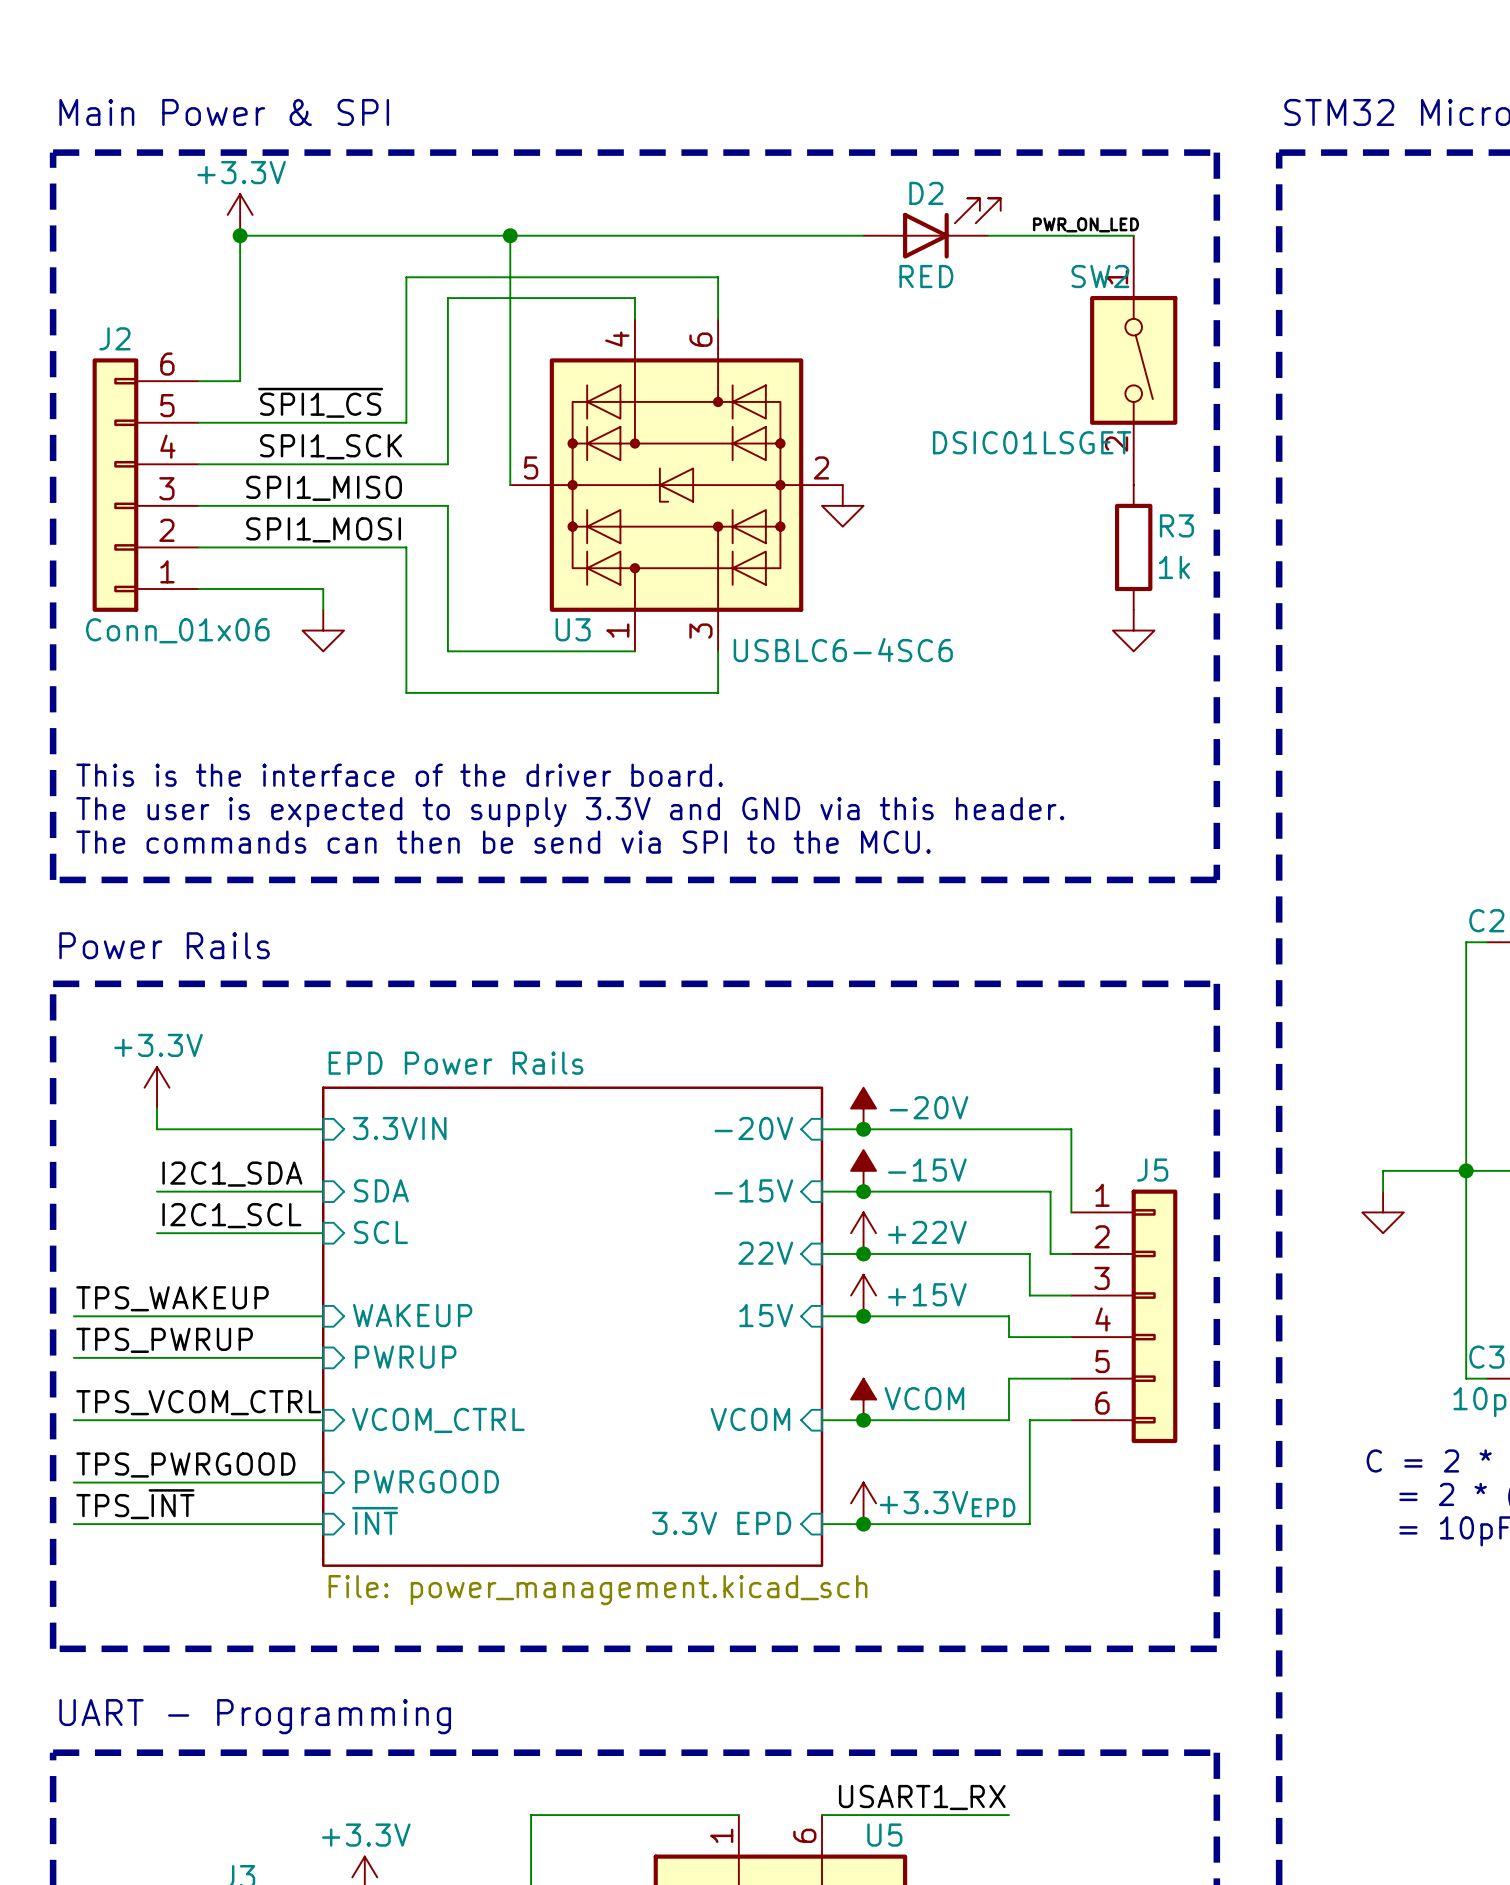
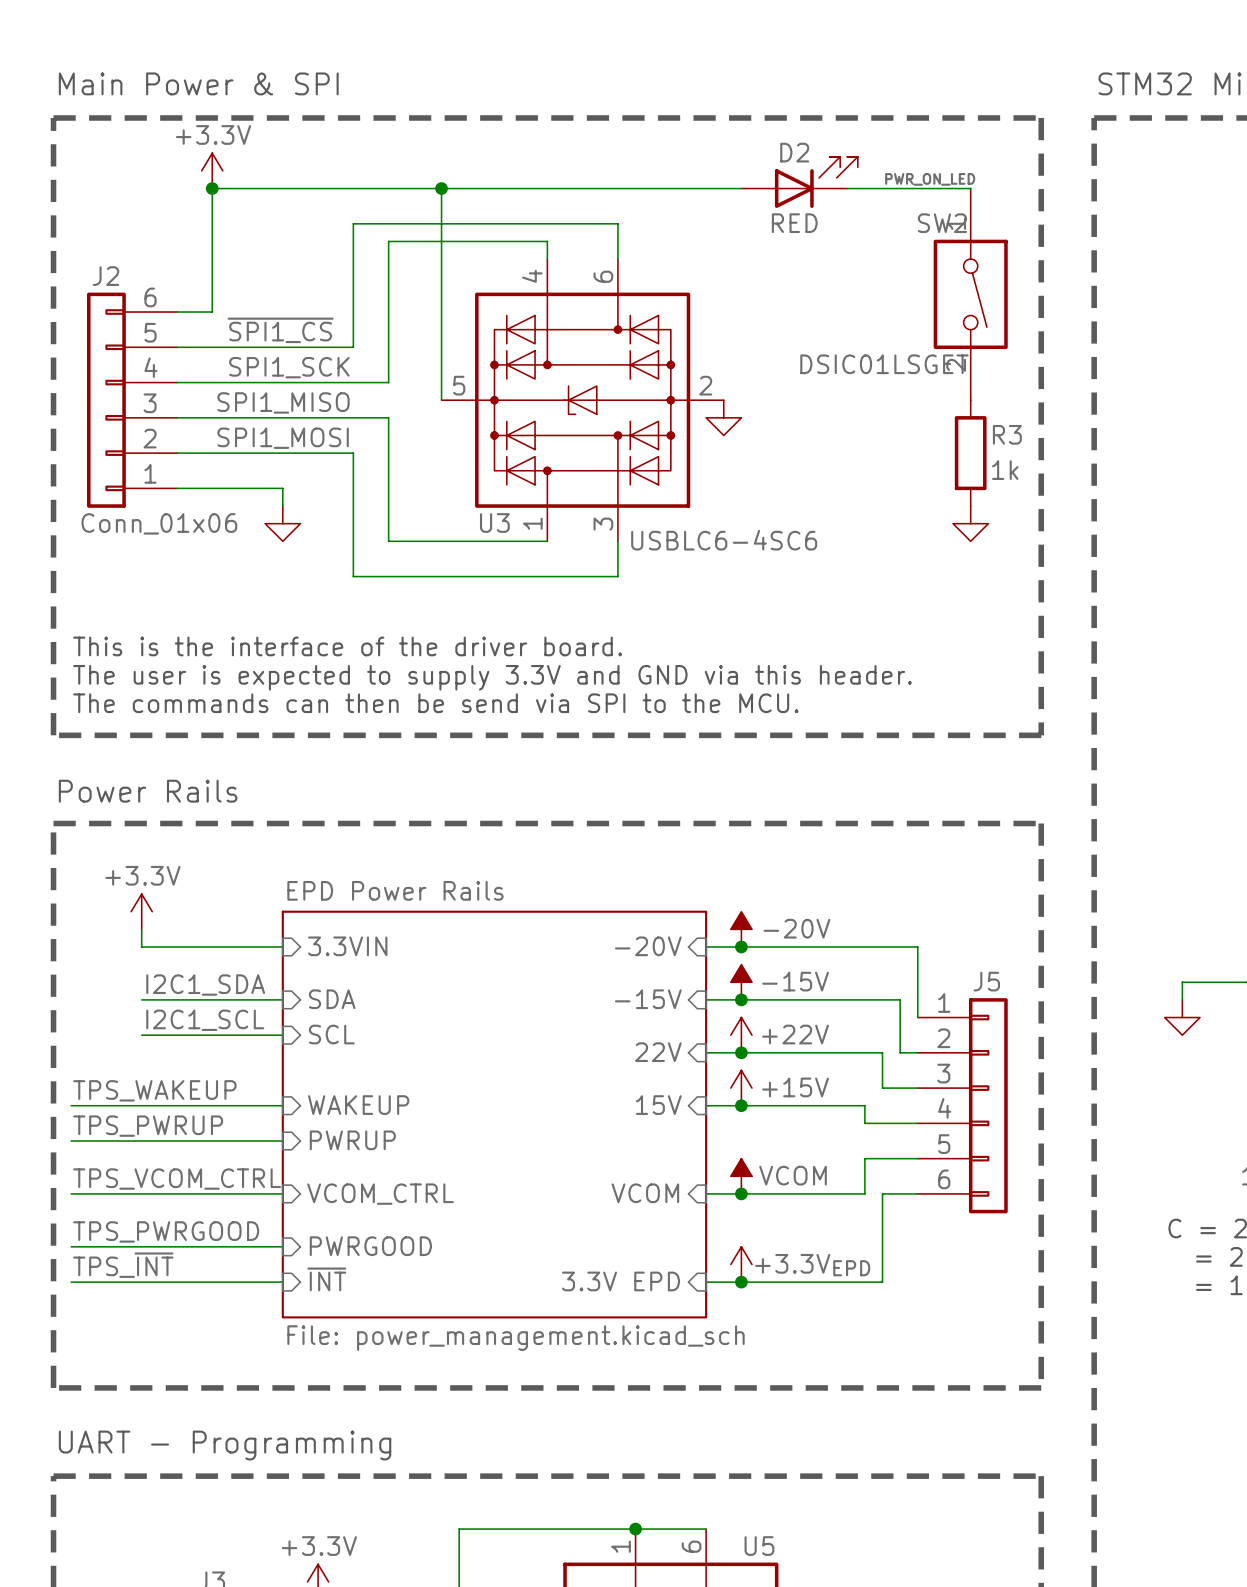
label: USART1_RX (922, 1797) -> none
junction: none -> (635, 1529)
wire: (821, 1815) (1009, 1815) -> (706, 1529) (635, 1529)

